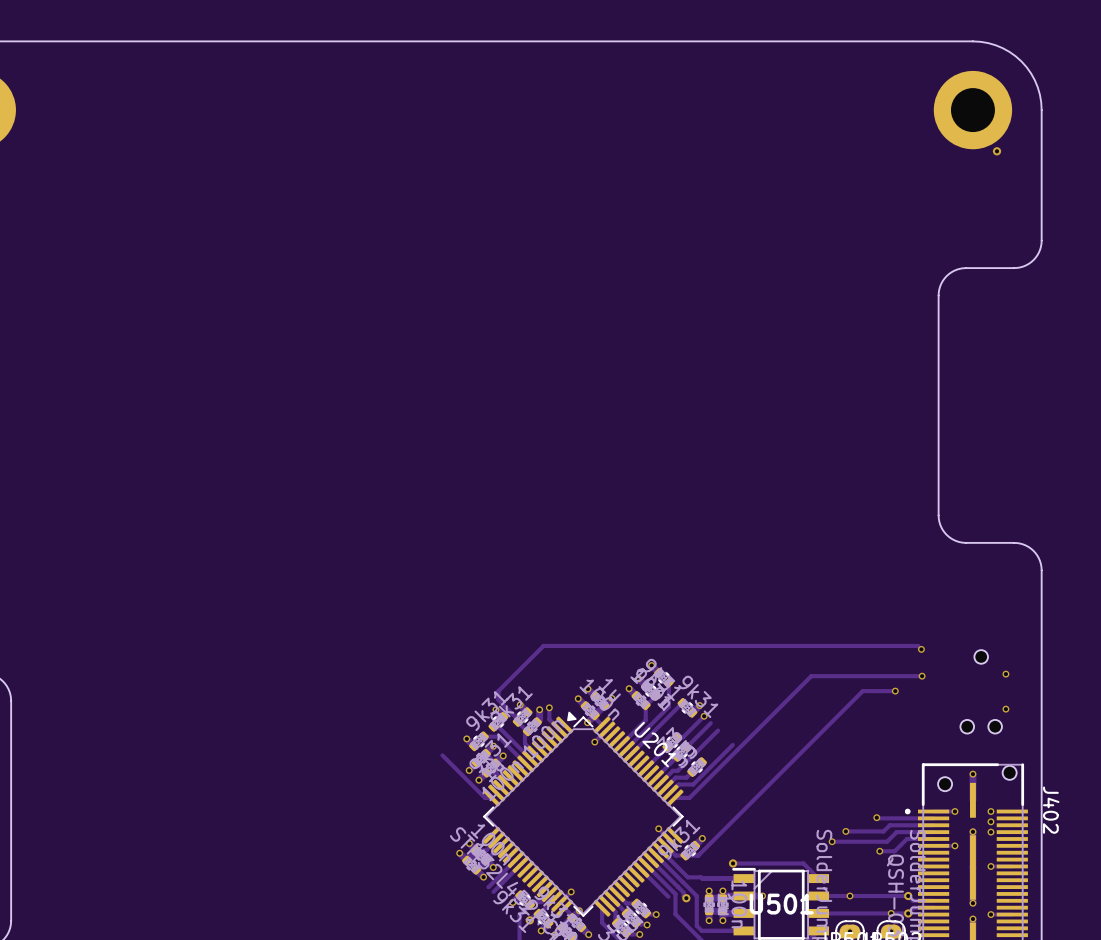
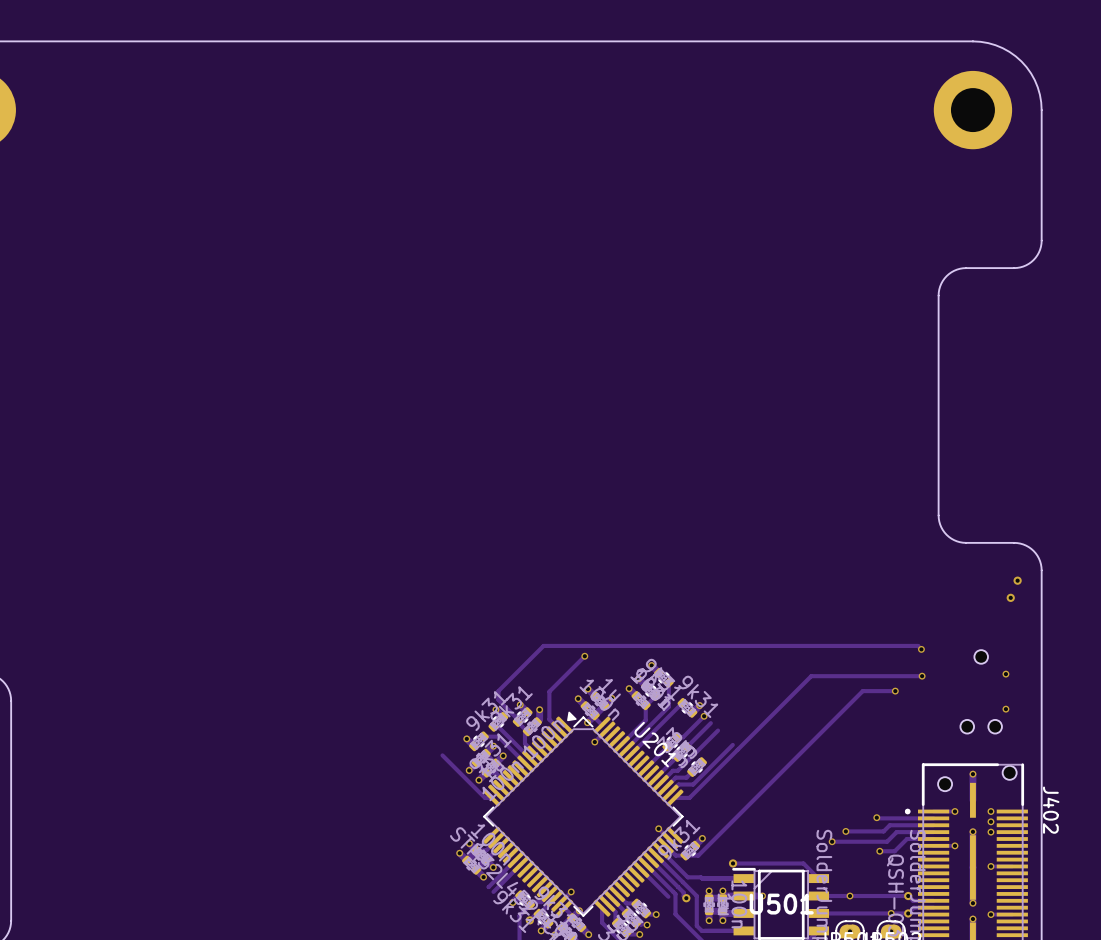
via: (997, 151) -> none
via: none -> (1017, 580)
via: none -> (1010, 597)
track: none -> (584, 656) (549, 691) (549, 707)
via position: (549, 707) -> (584, 656)

